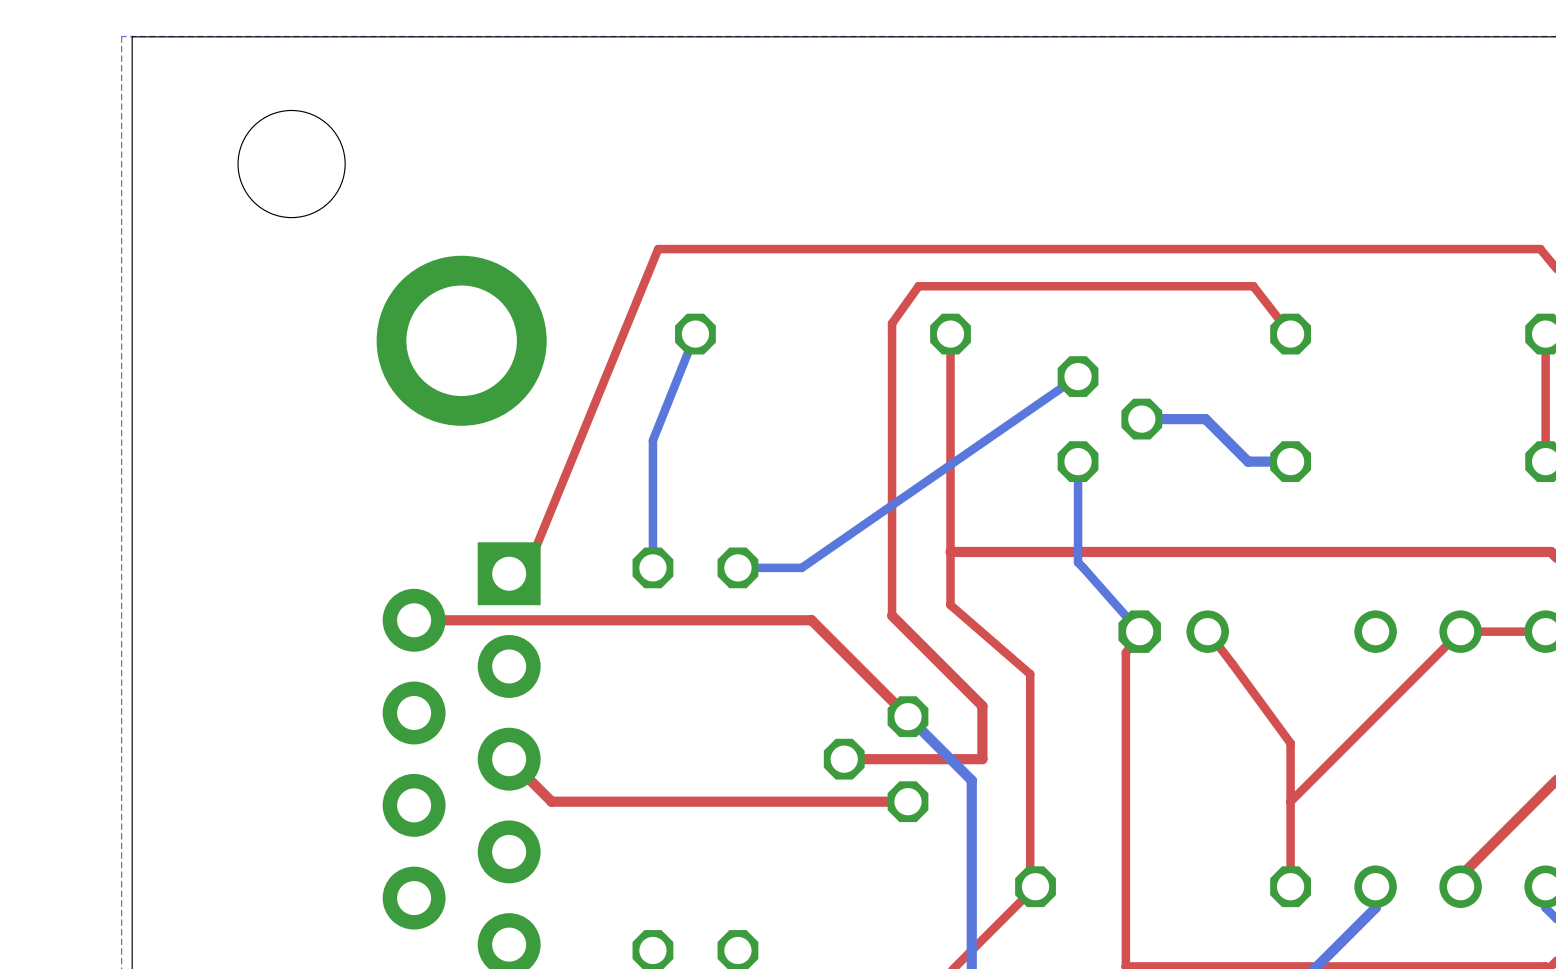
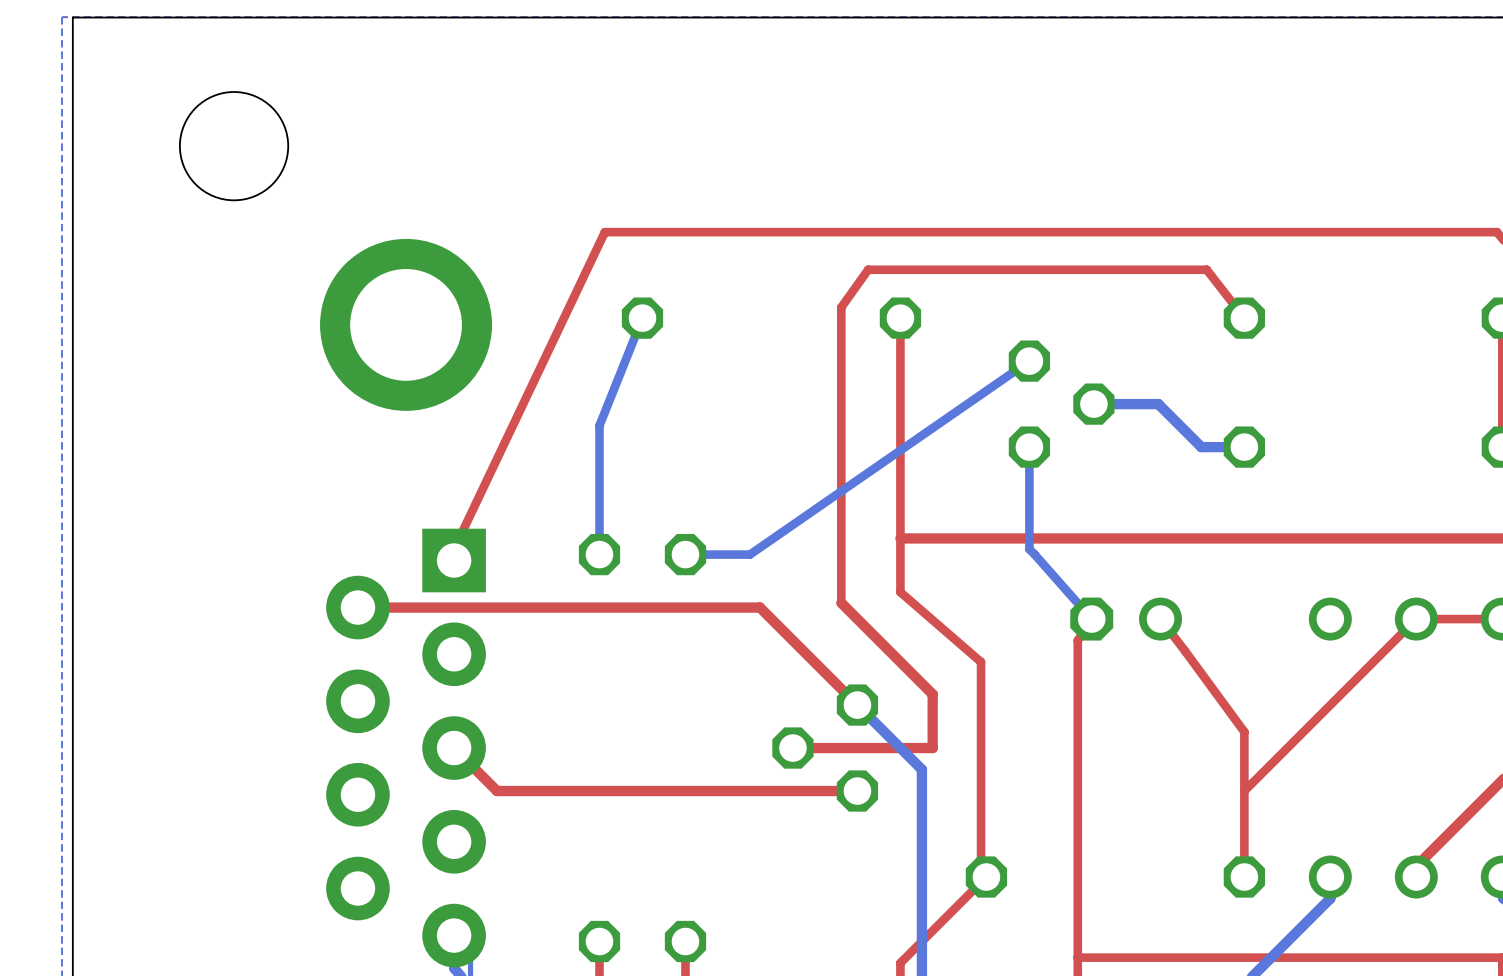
top track: (658, 249) (525, 573) (509, 573) -> (604, 232) (449, 559) (432, 559)

